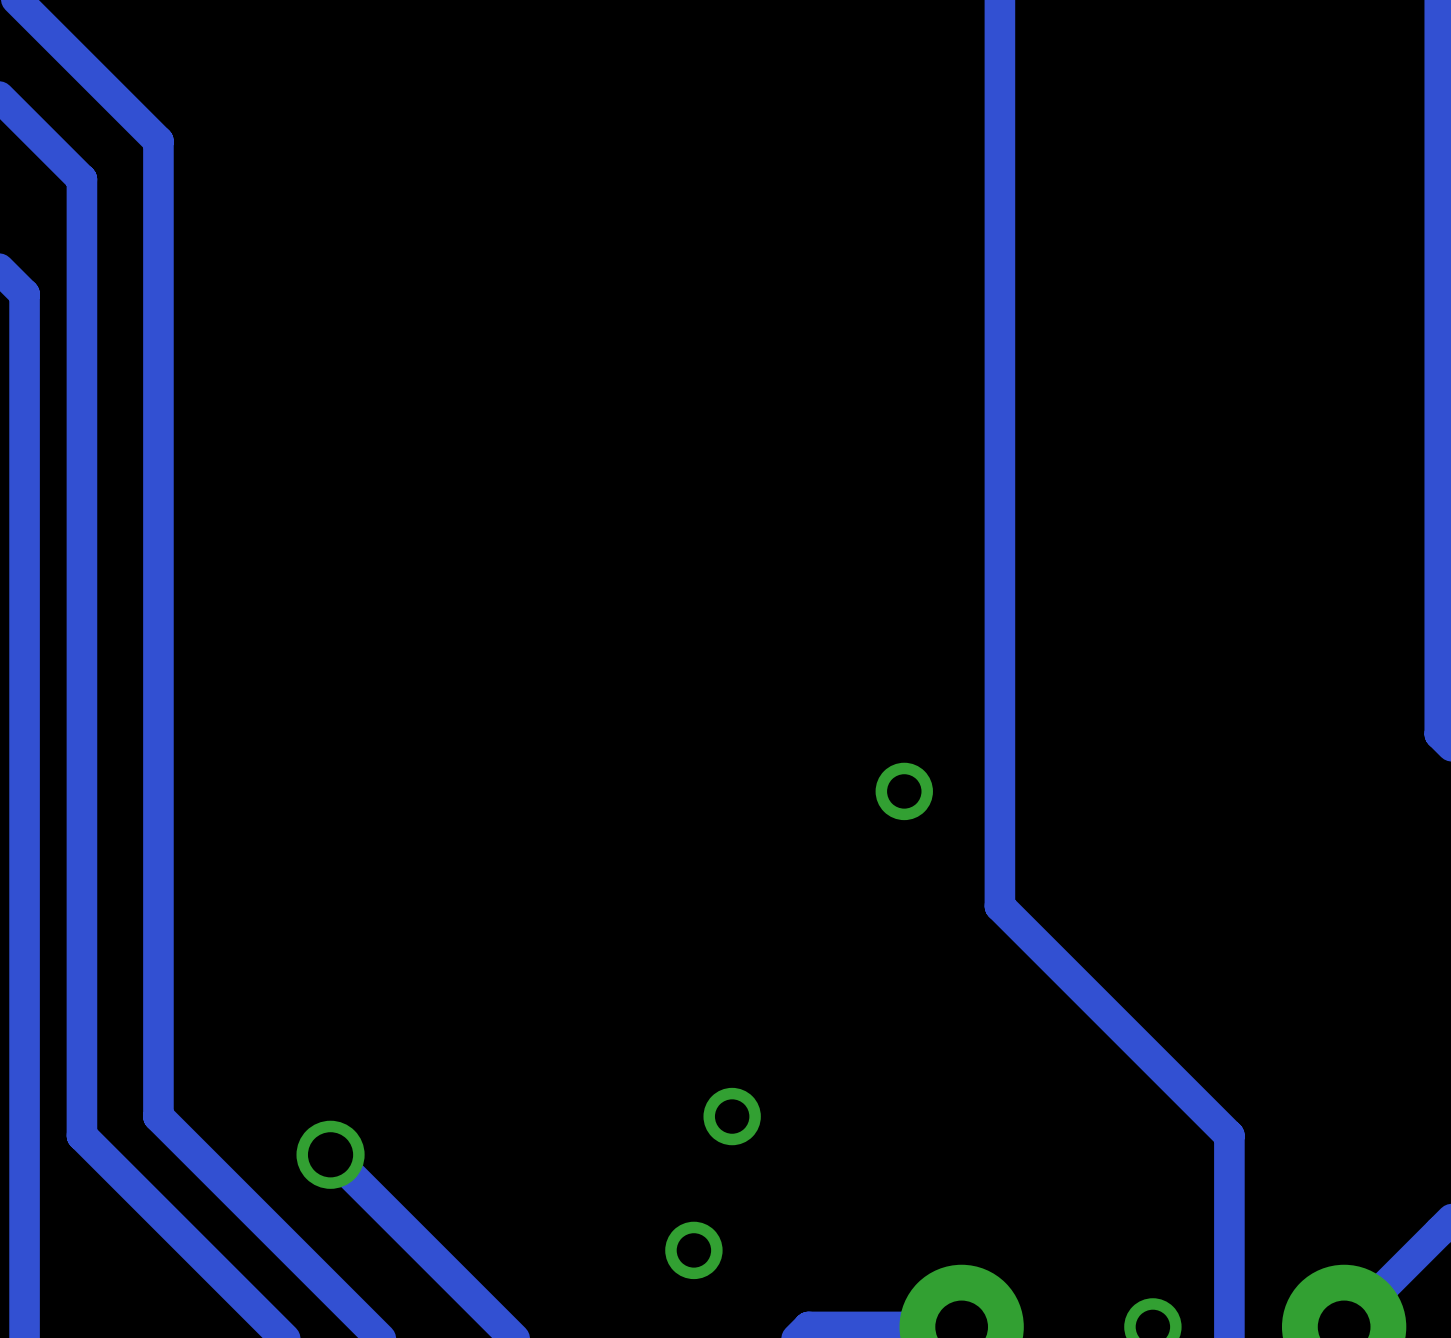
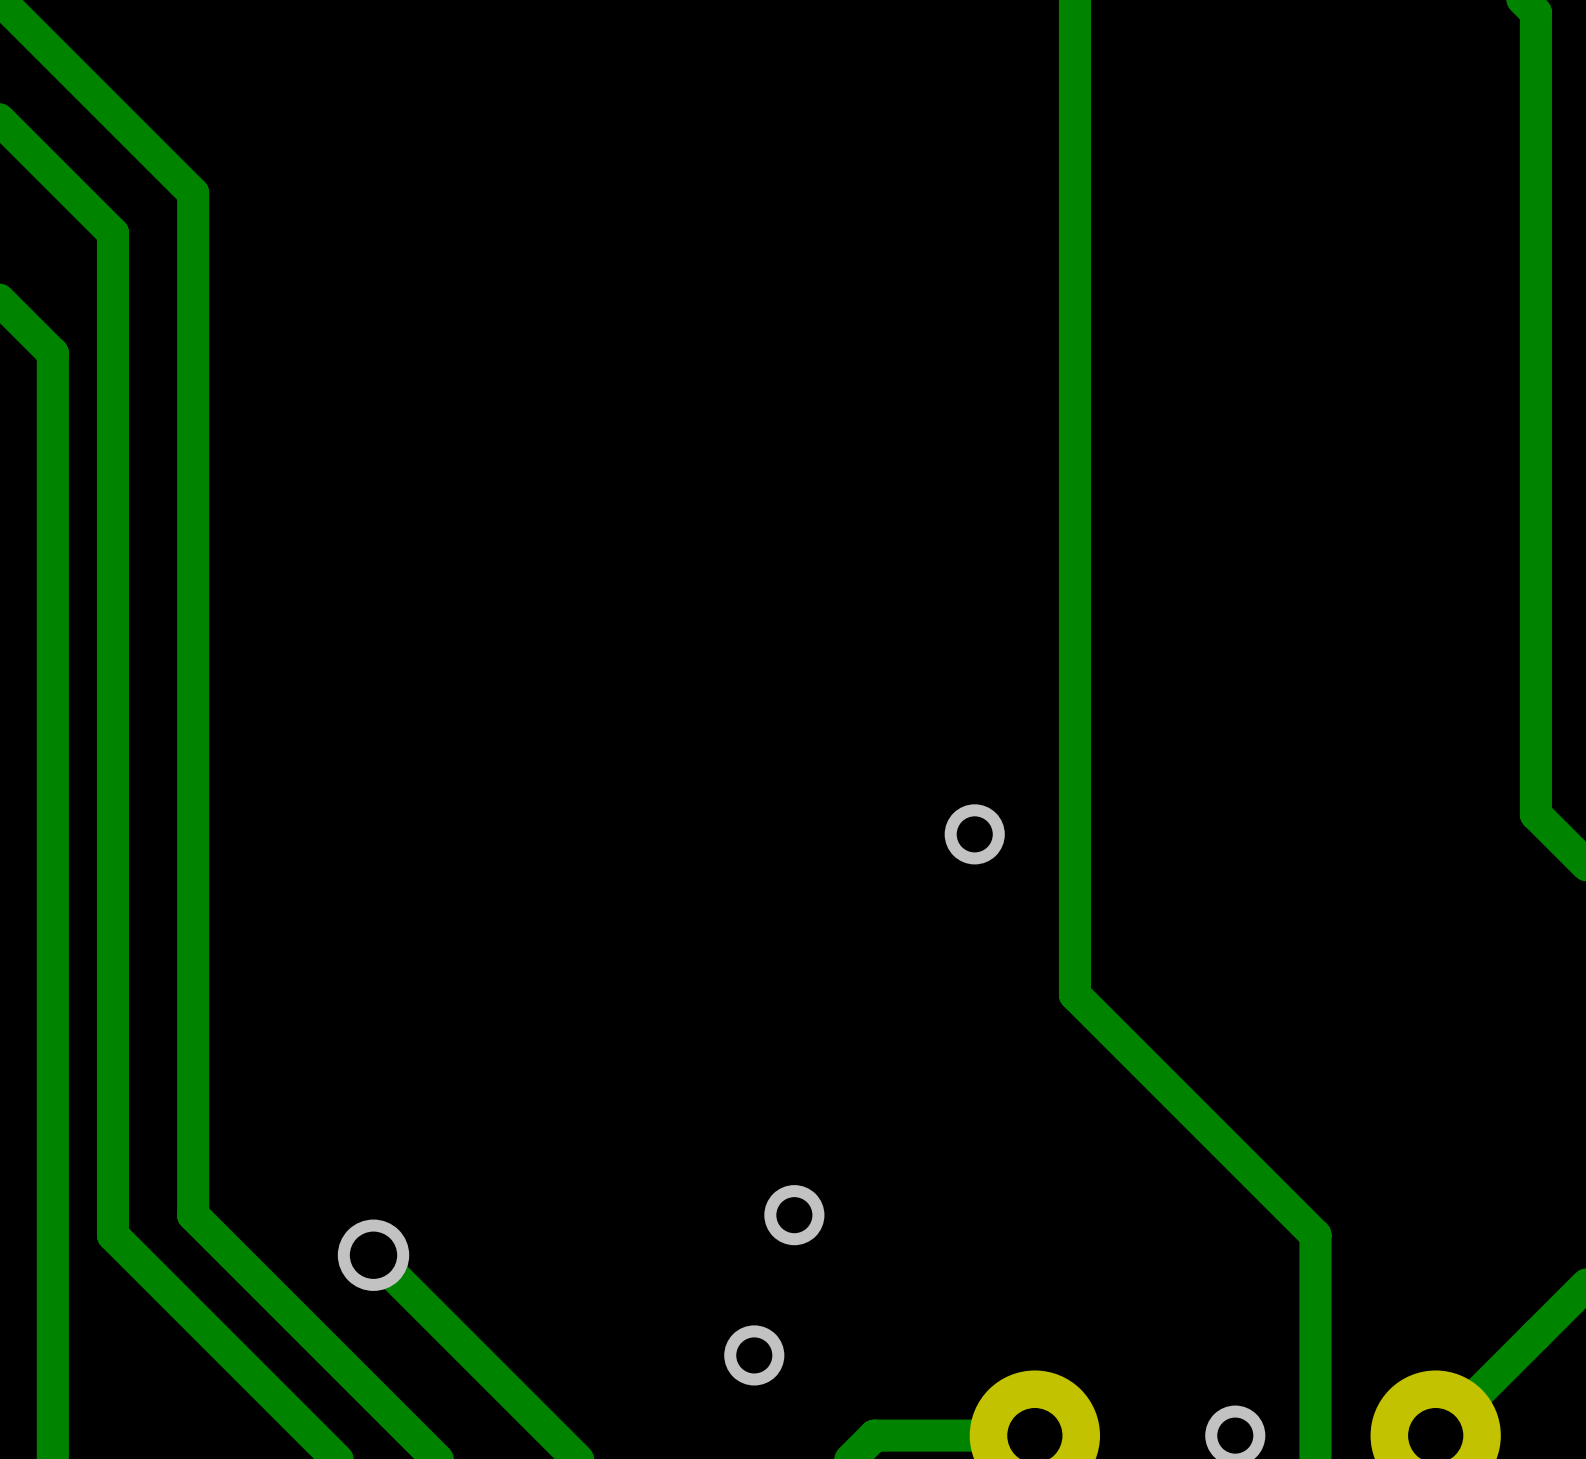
via position: (904, 791) -> (974, 834)

